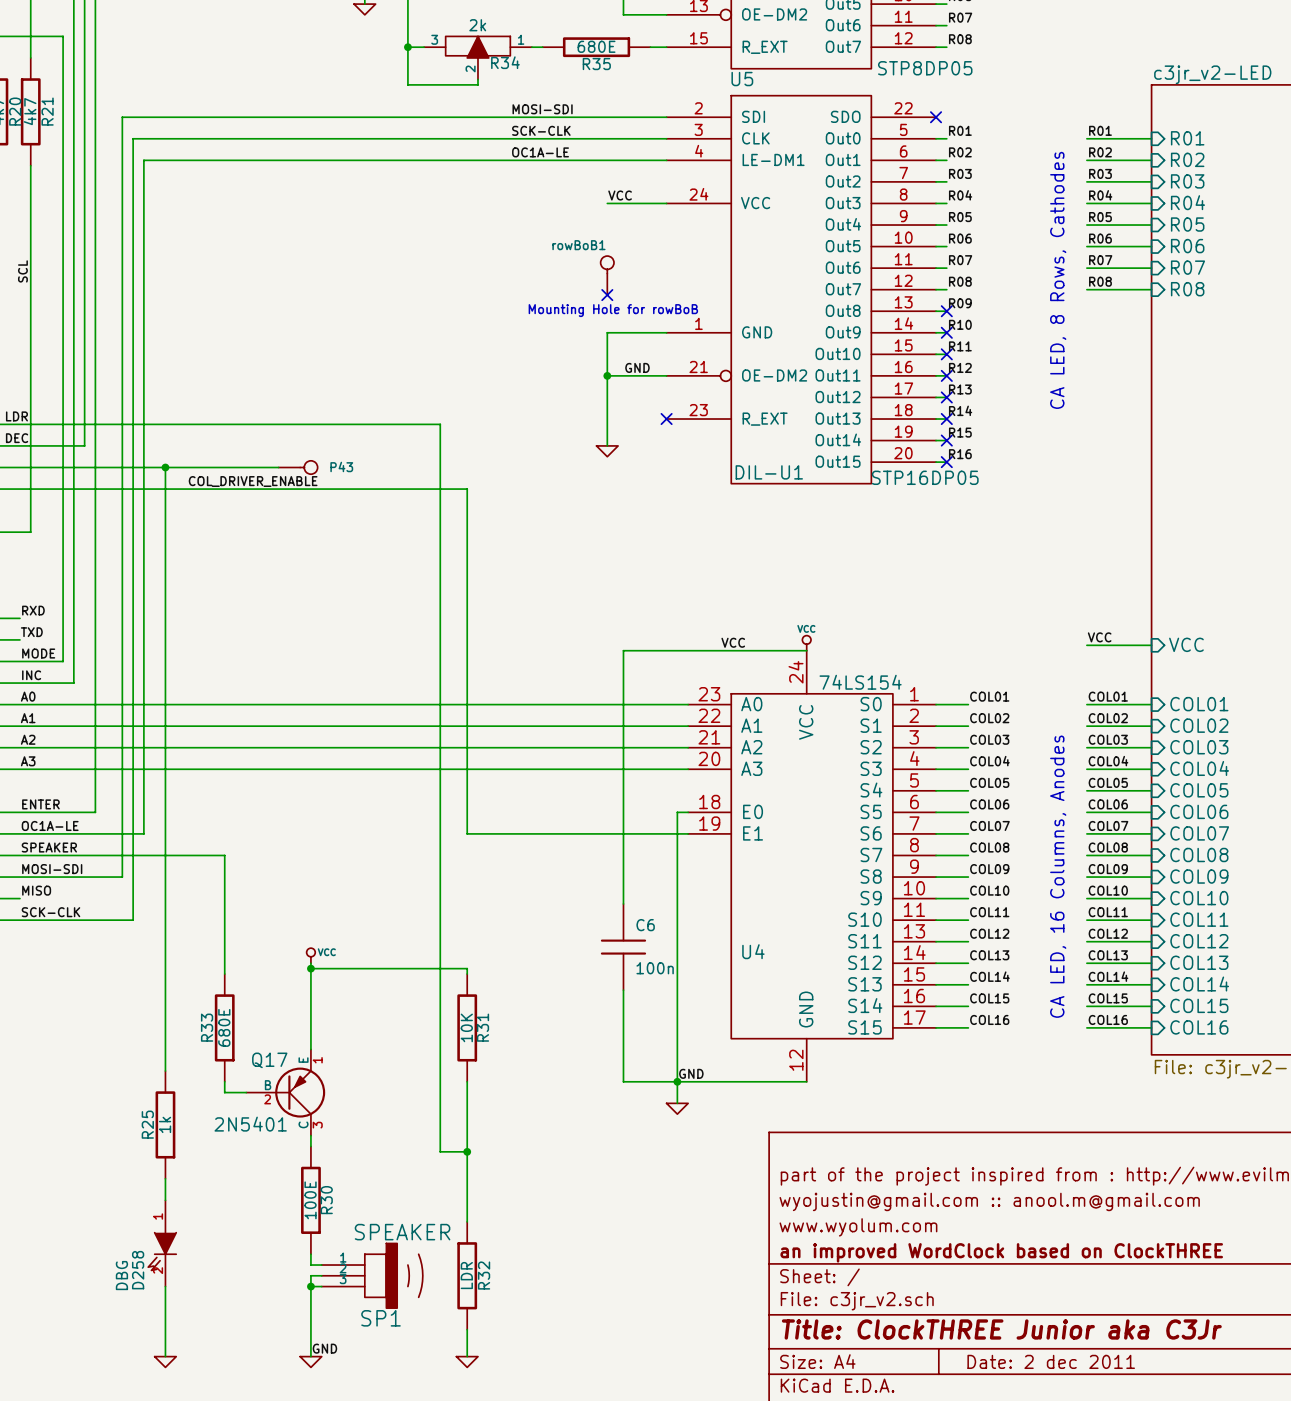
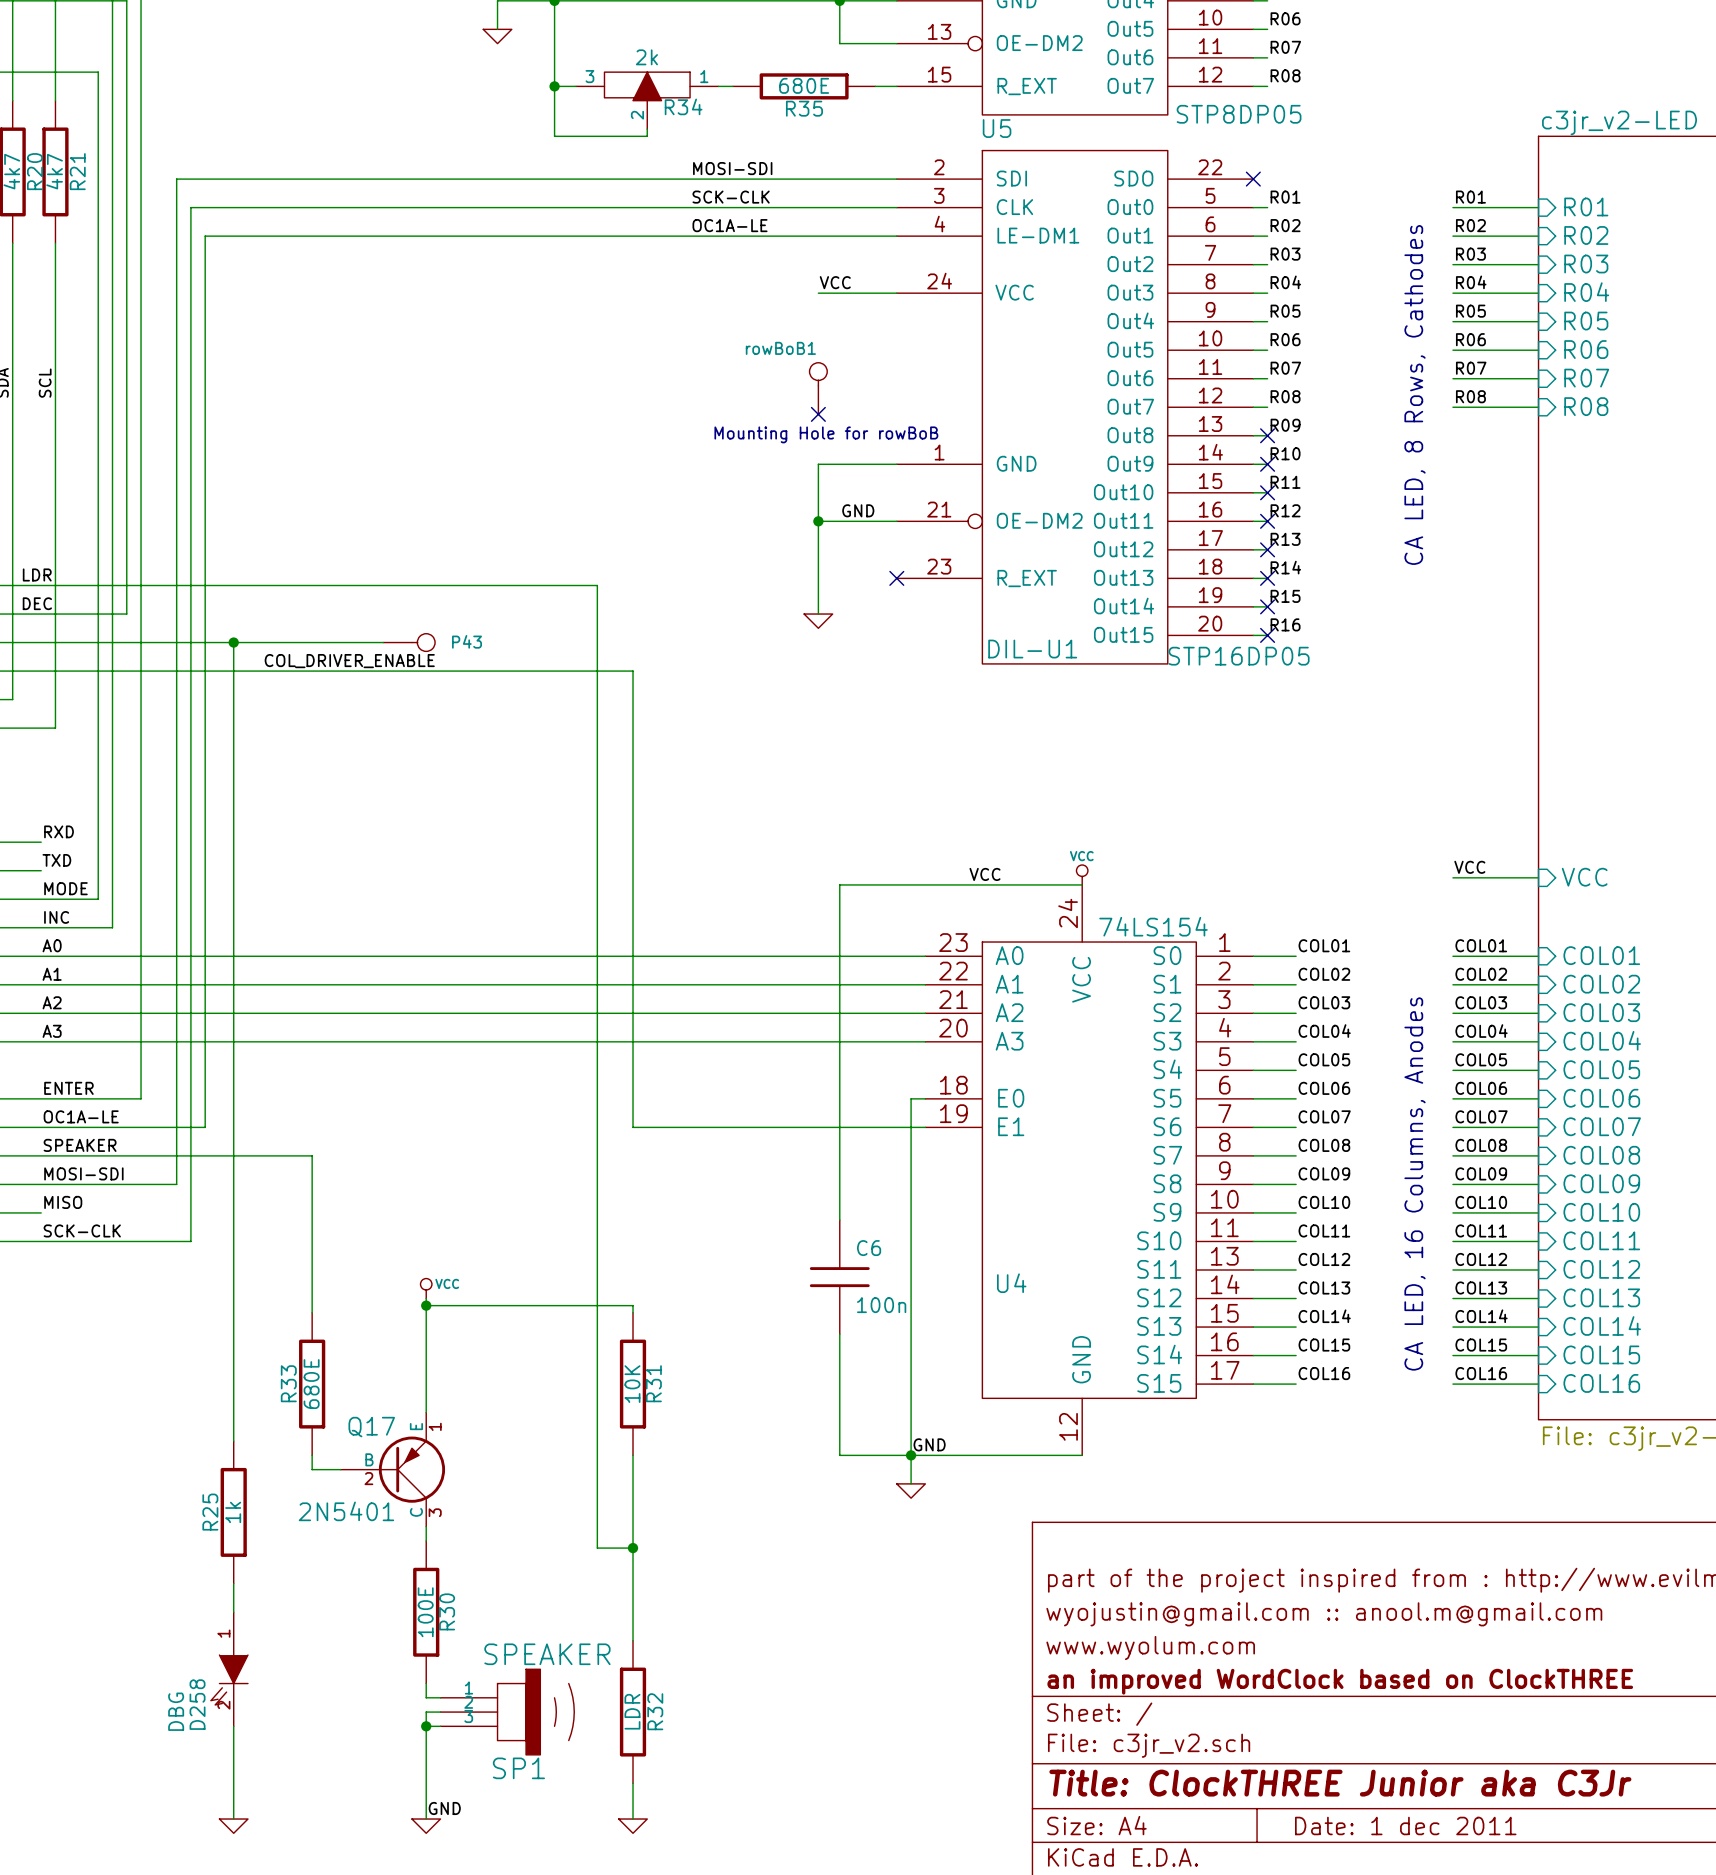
title block: Date: 2 dec 2011 (1051, 1361) -> Date: 1 dec 2011 (1405, 1825)

